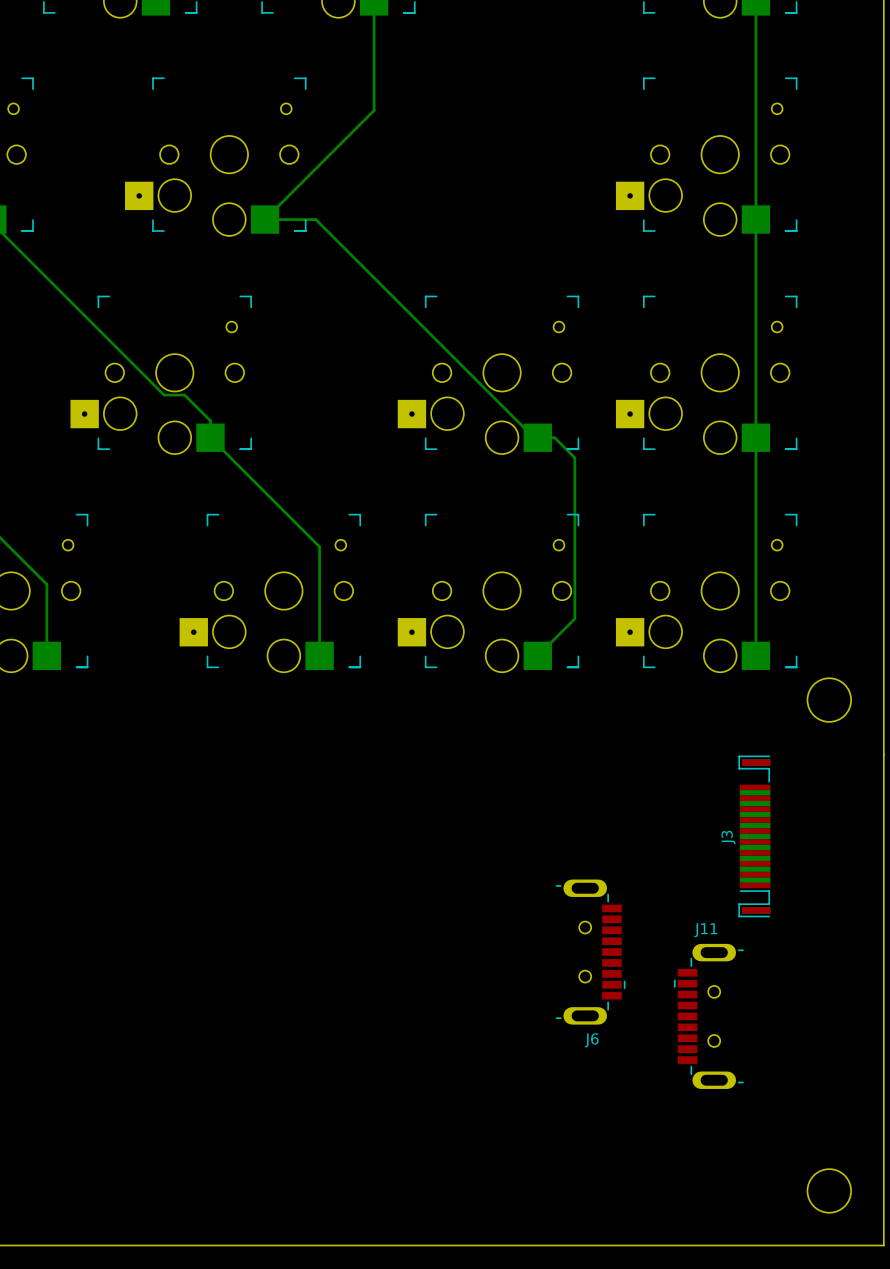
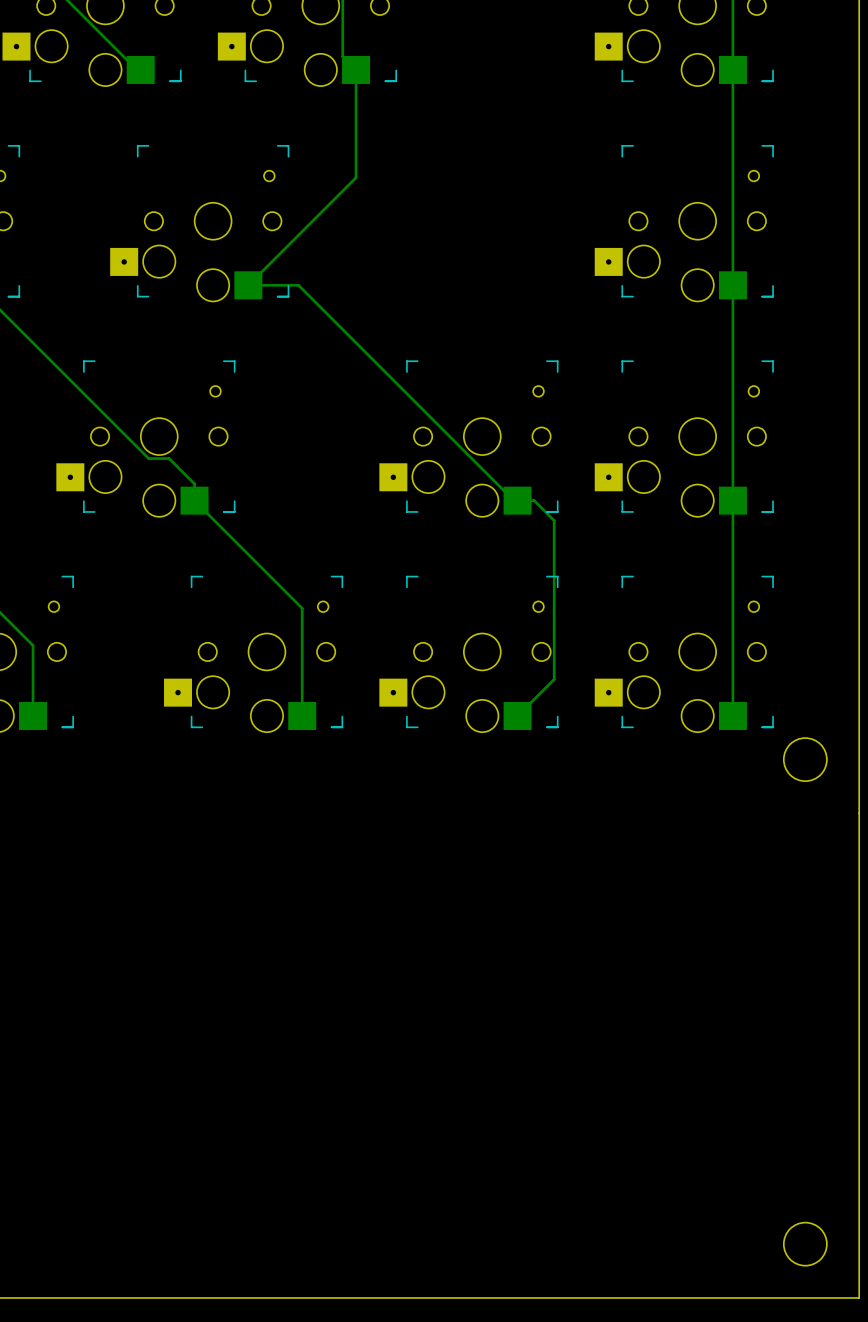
J3: (754, 836) -> none
J6: (590, 952) -> none
J11: (708, 1016) -> none

